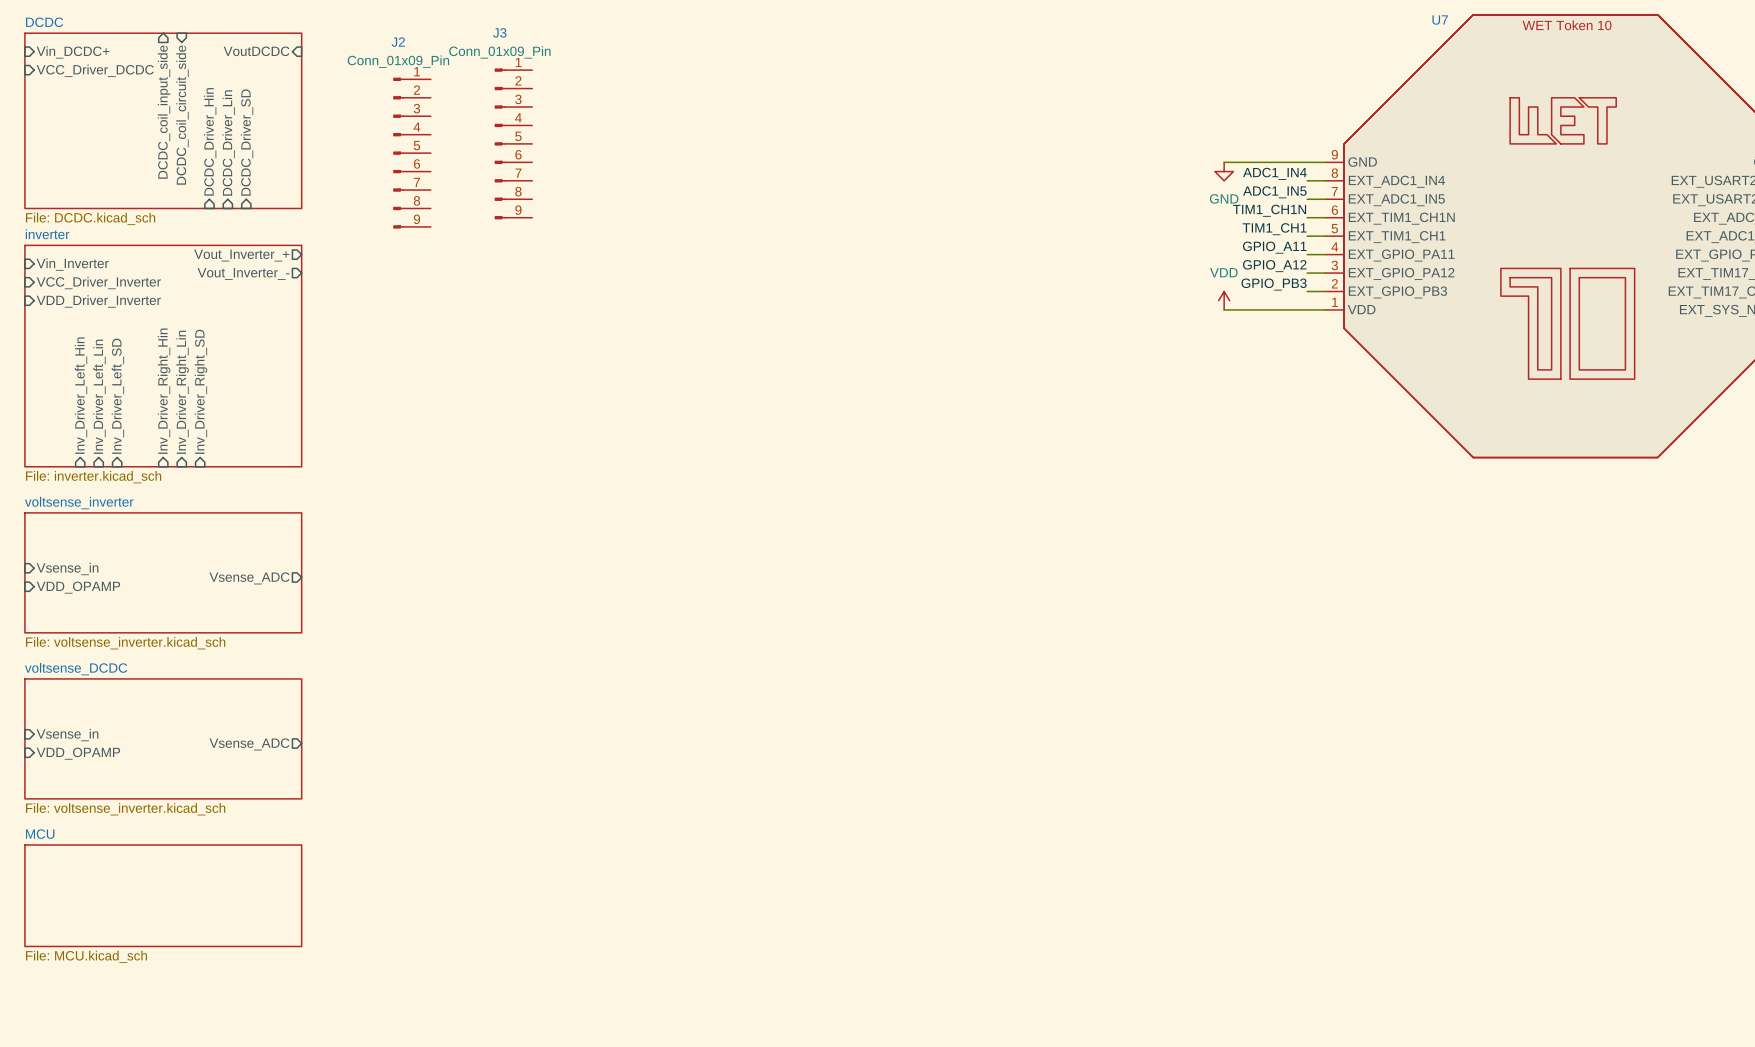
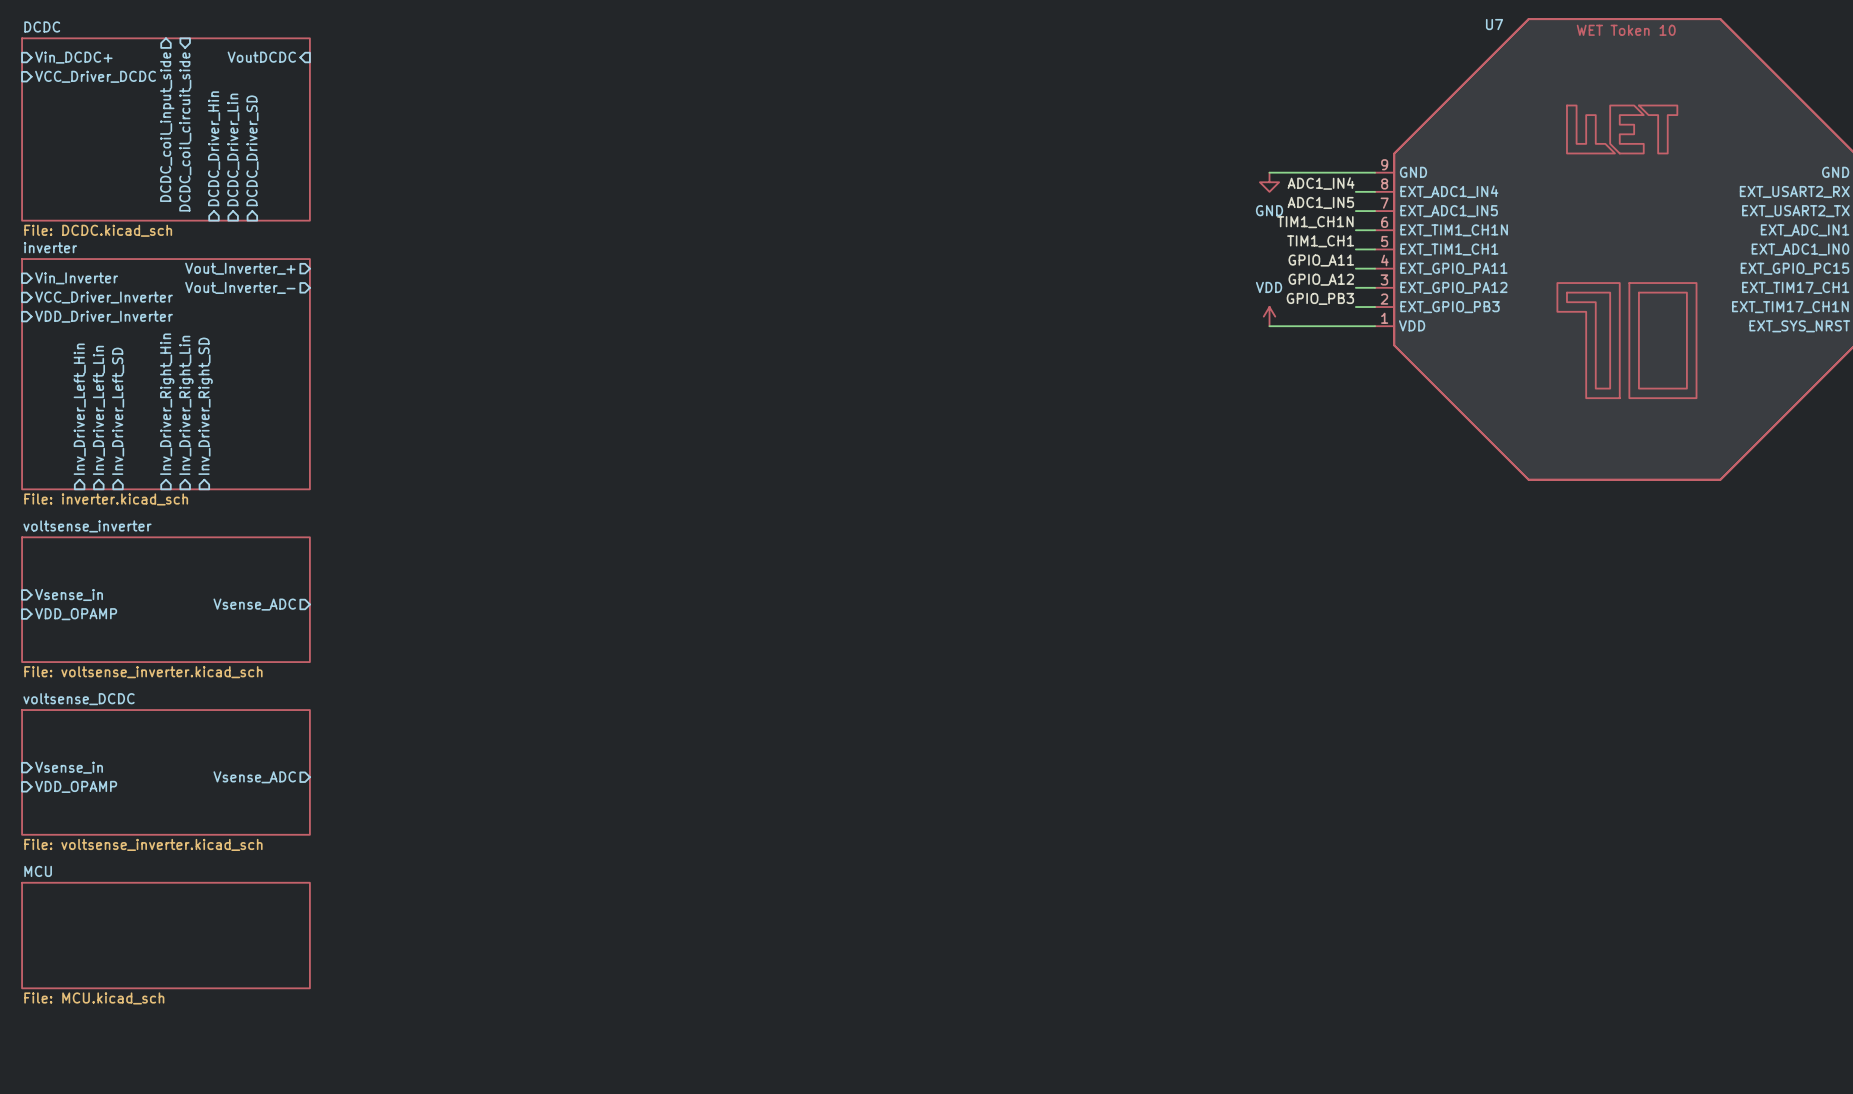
J3: Conn_01x09_Pin (513, 143) -> none
J2: Conn_01x09_Pin (412, 153) -> none

